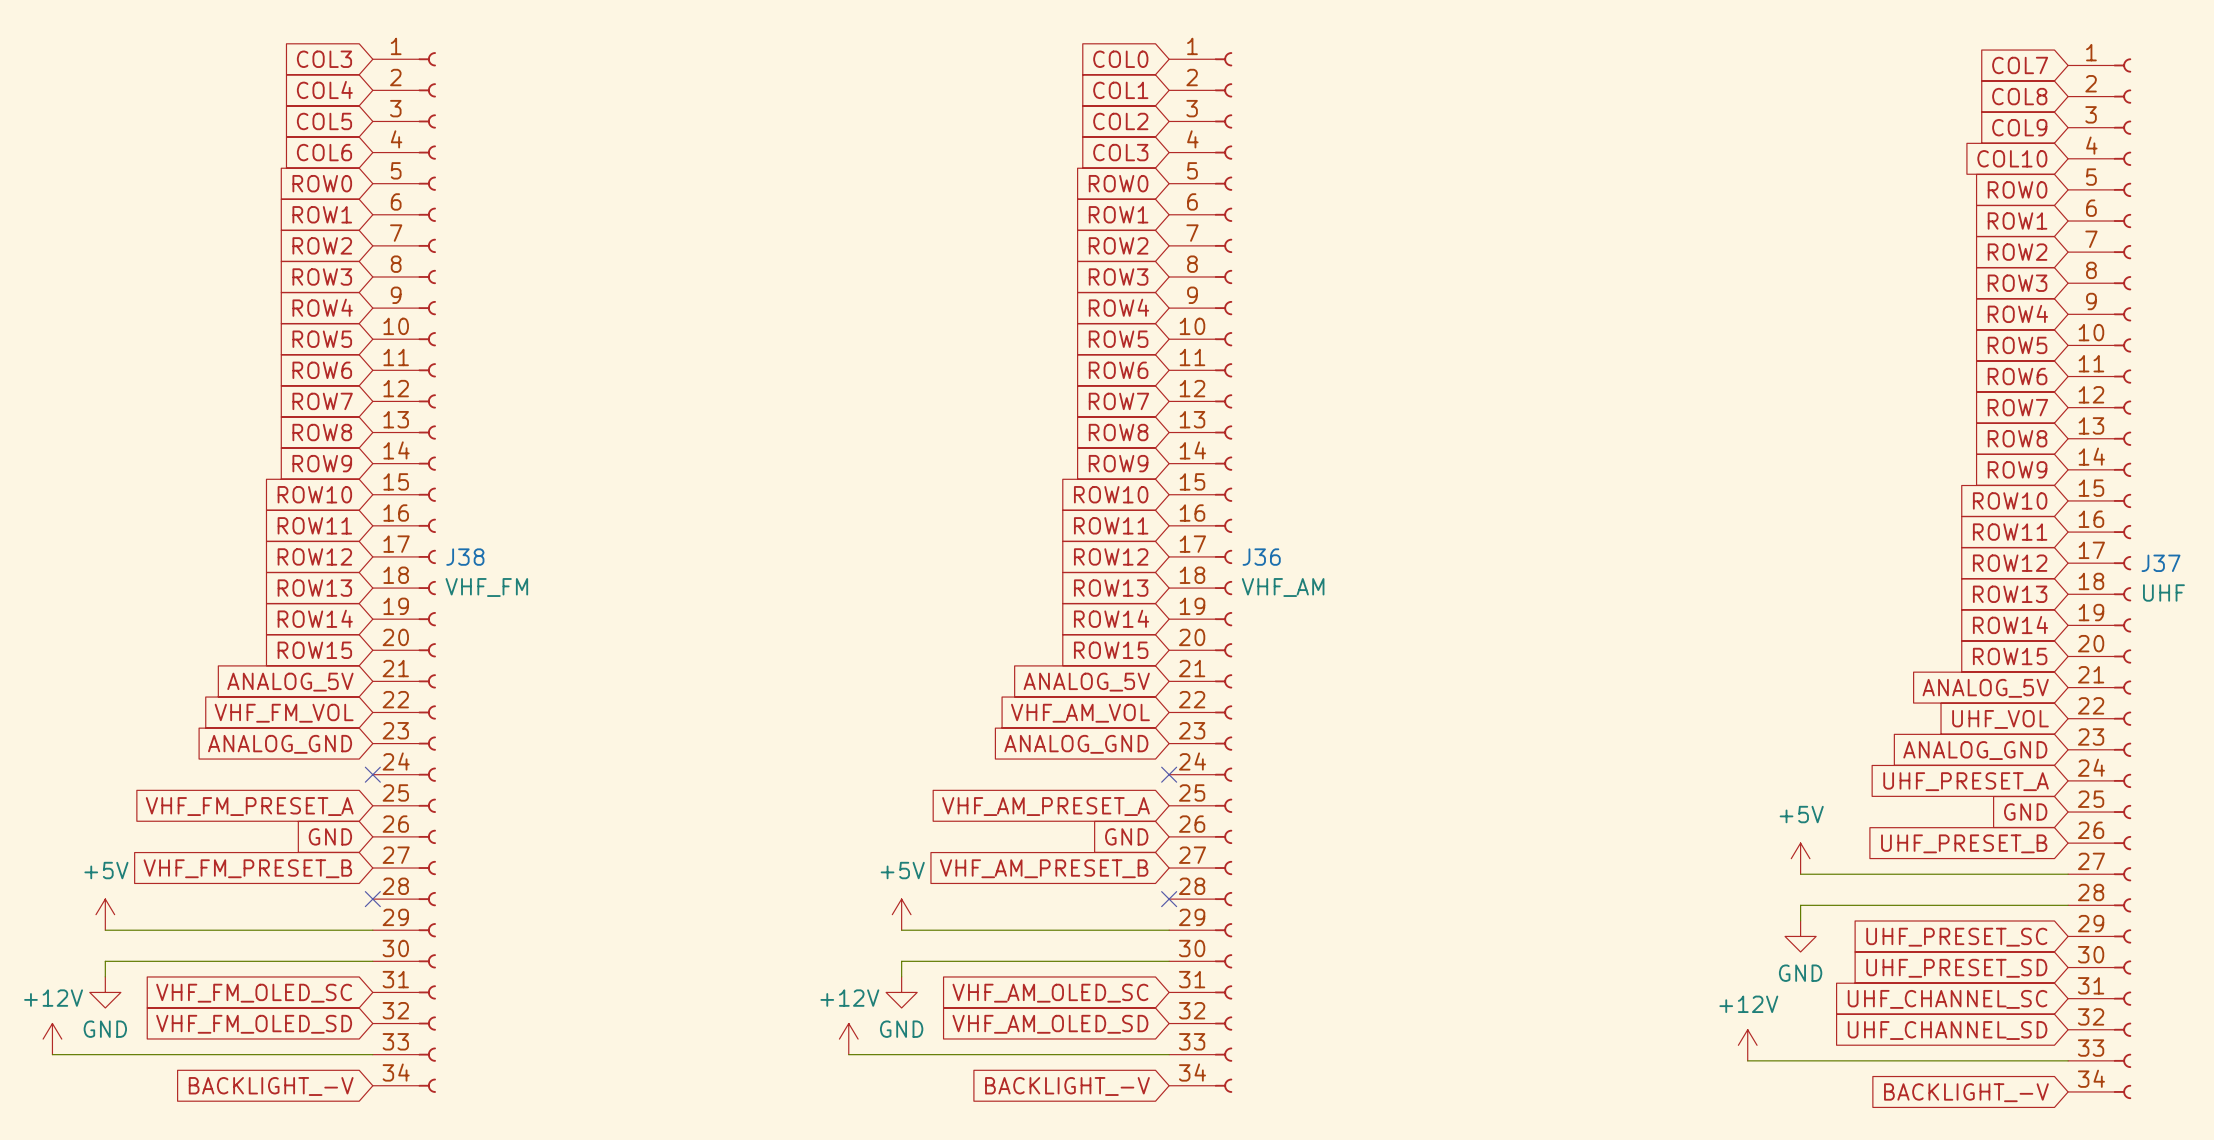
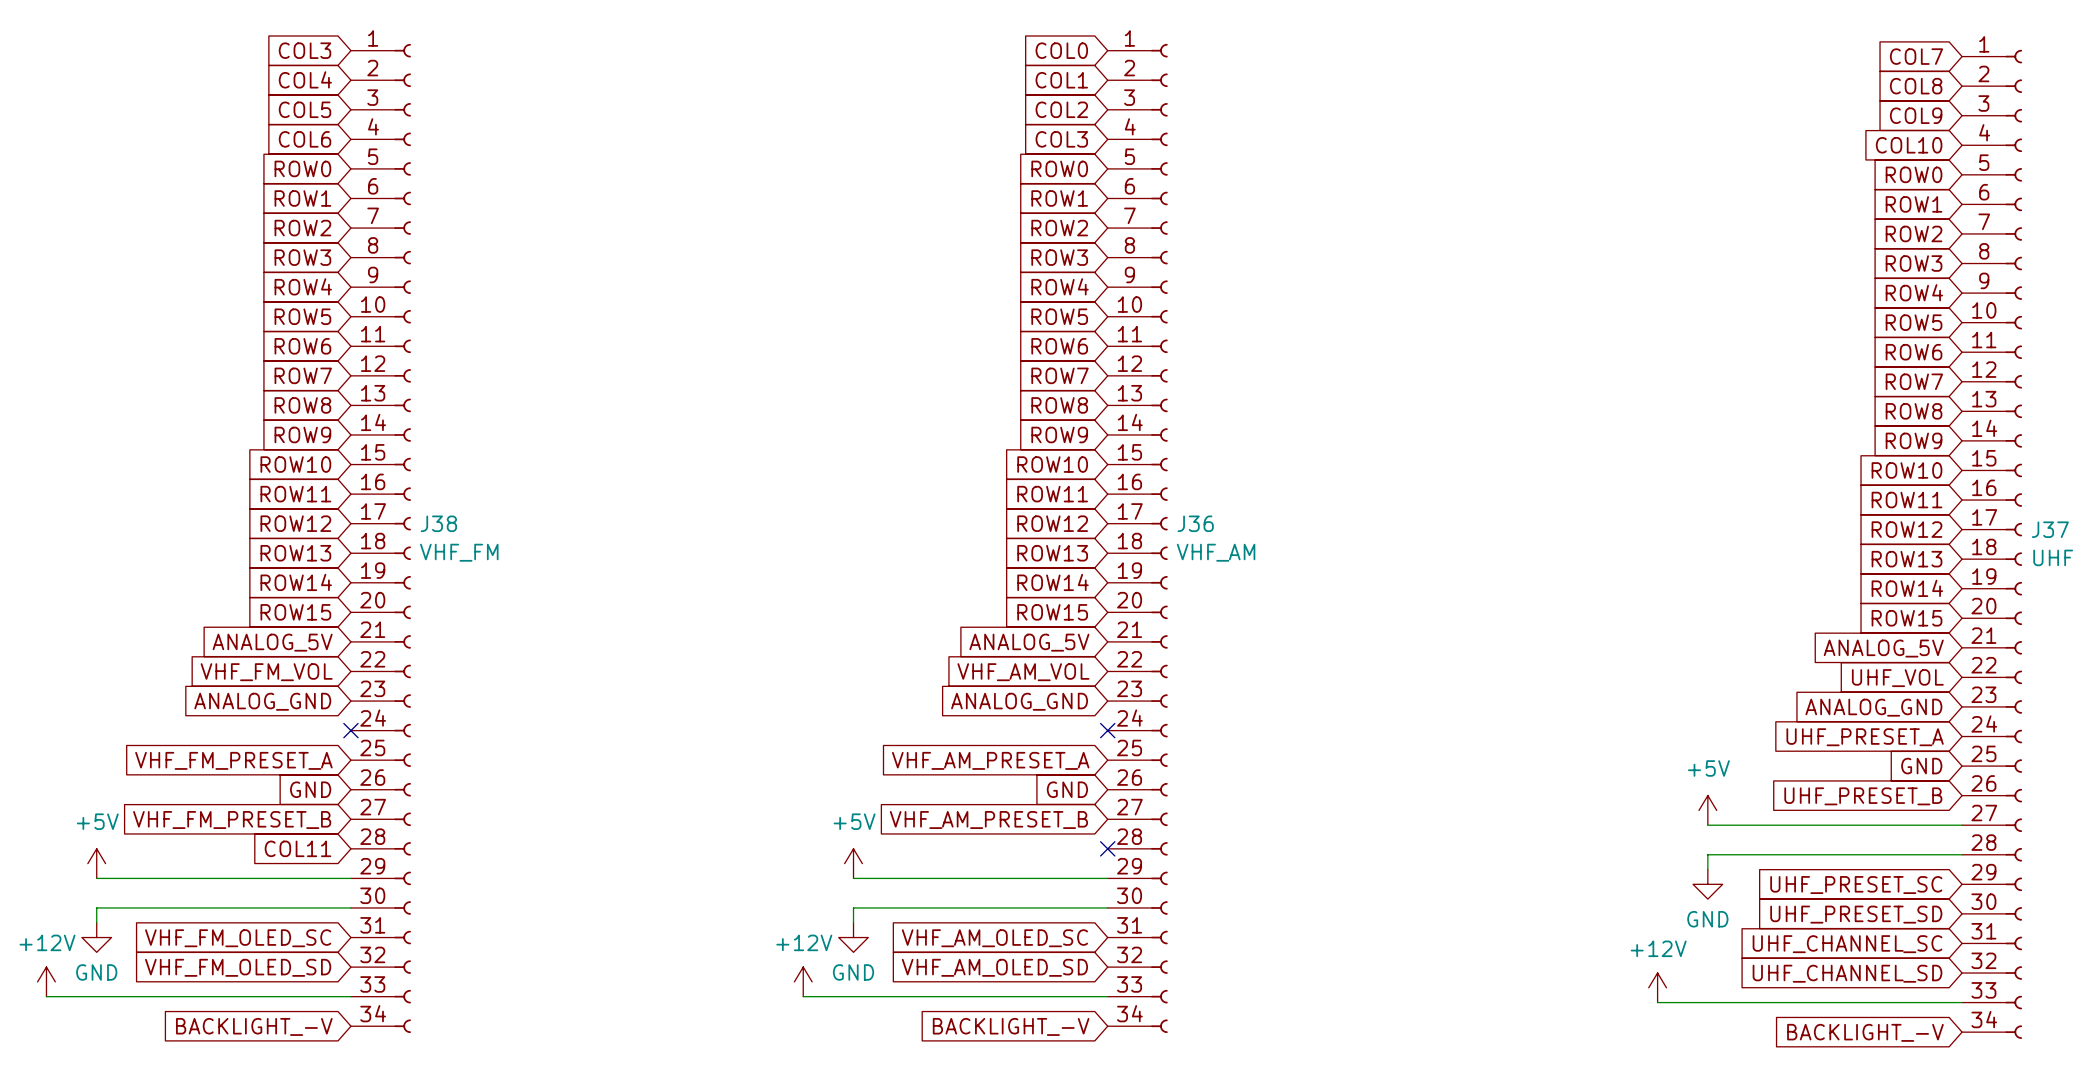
global label: none -> COL11 (297, 848)
no-connect mark: (372, 899) -> none

